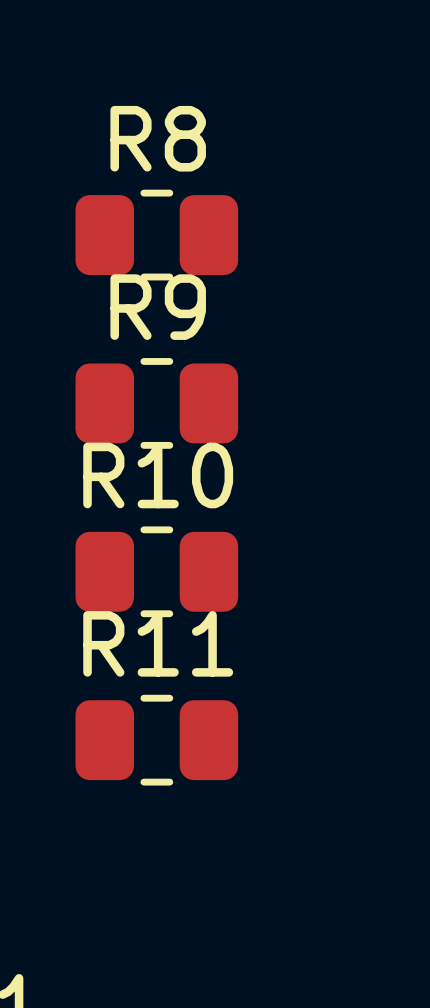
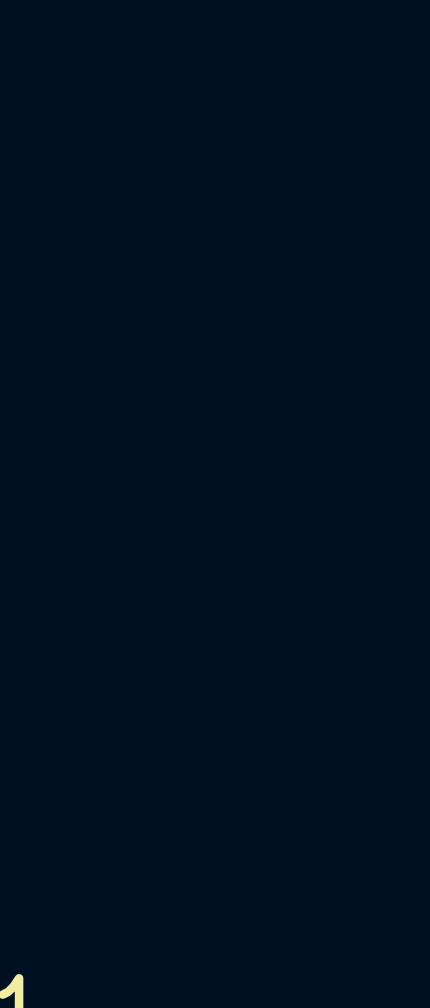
R8: (156, 235) -> none
R9: (156, 403) -> none
R10: (156, 571) -> none
R11: (156, 740) -> none

